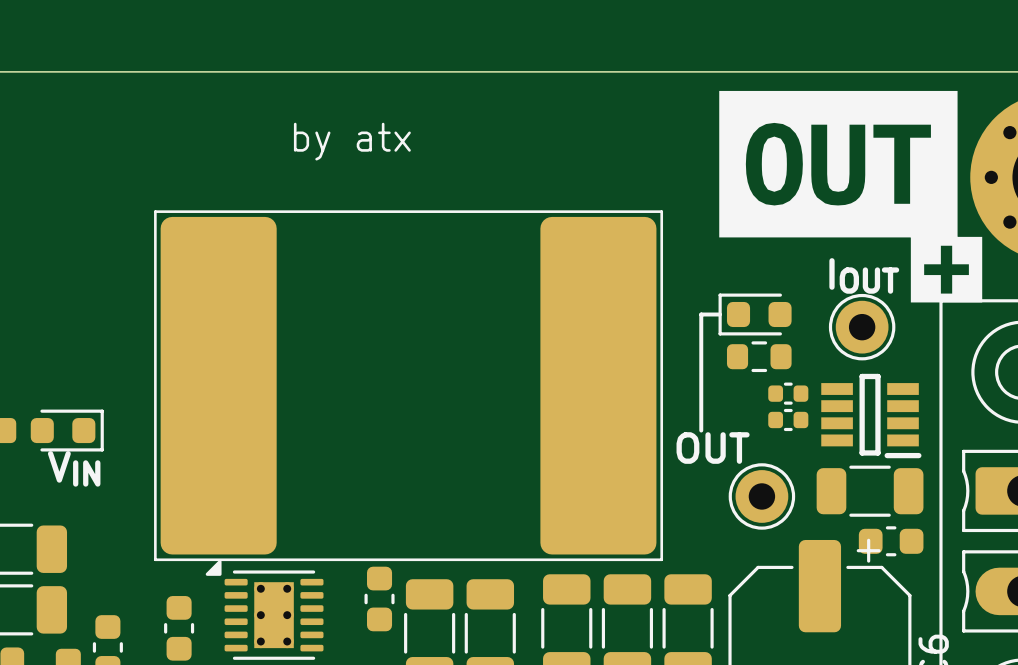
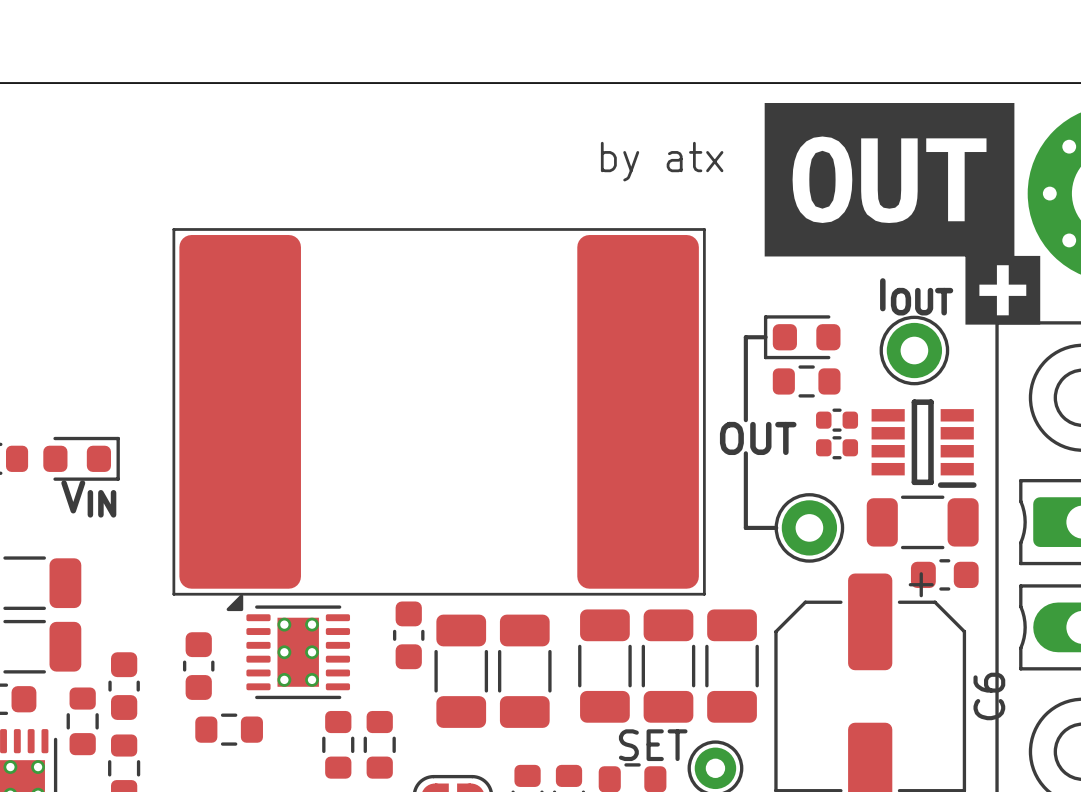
text position: by atx (352, 141) -> by atx (662, 161)
line: (701, 393) (701, 425) -> none
line: none -> (745, 458) (745, 527) (776, 527)
part value position: OUT (713, 448) -> OUT (758, 438)

